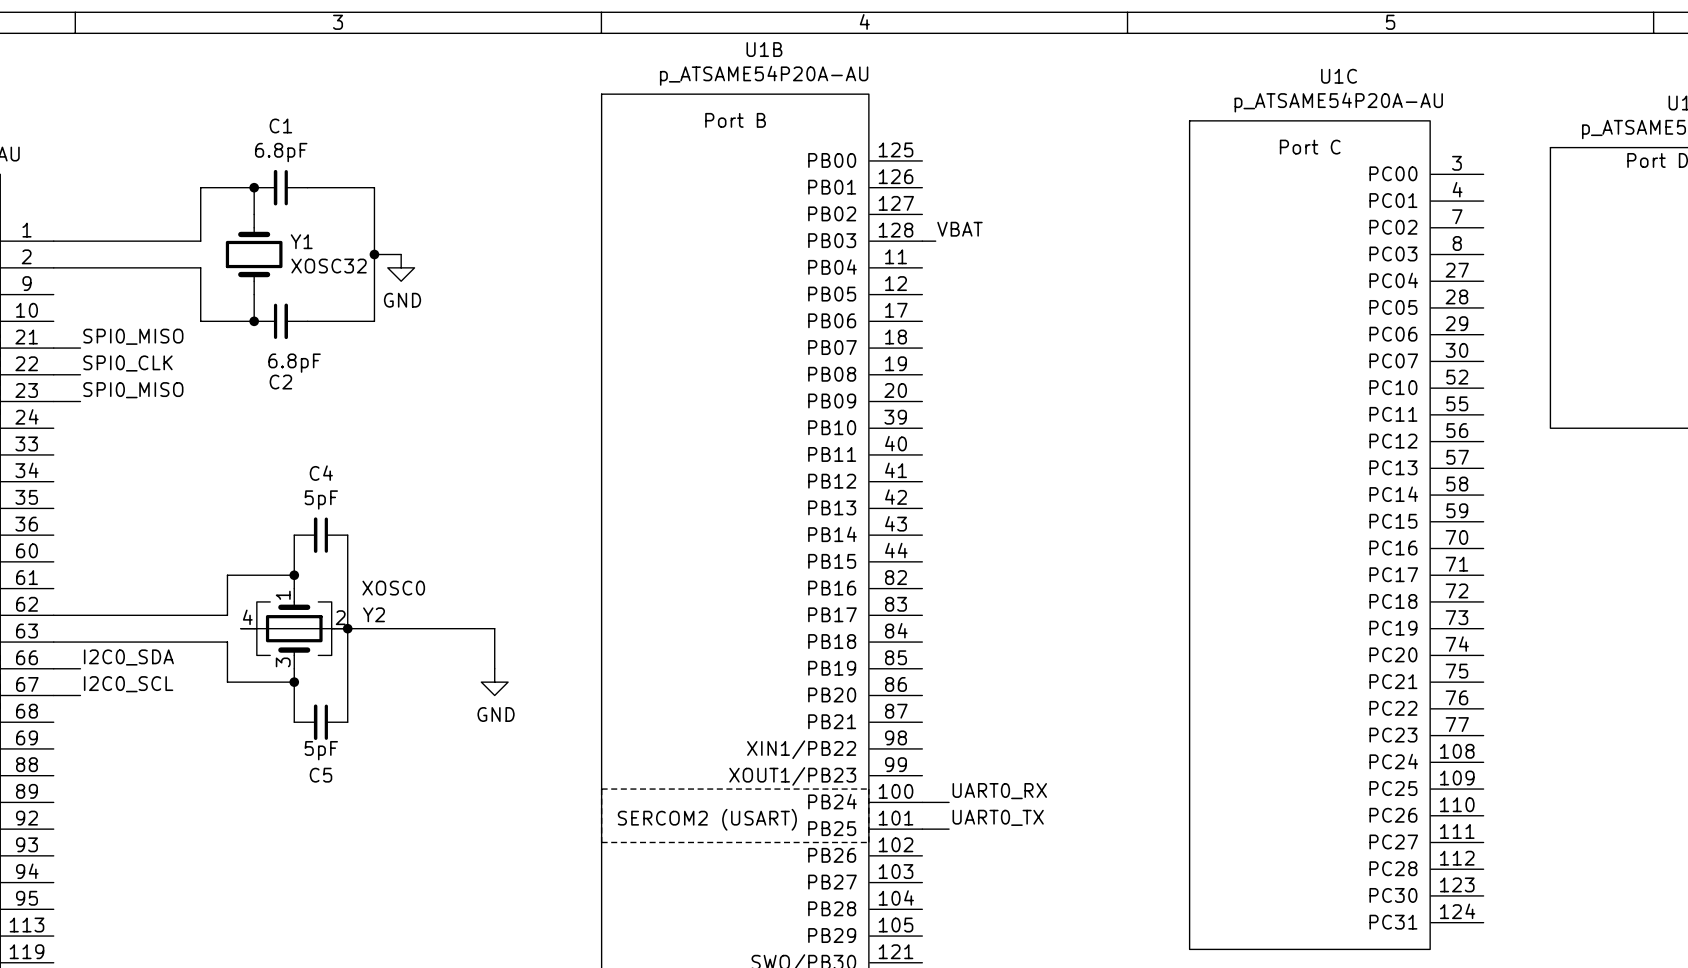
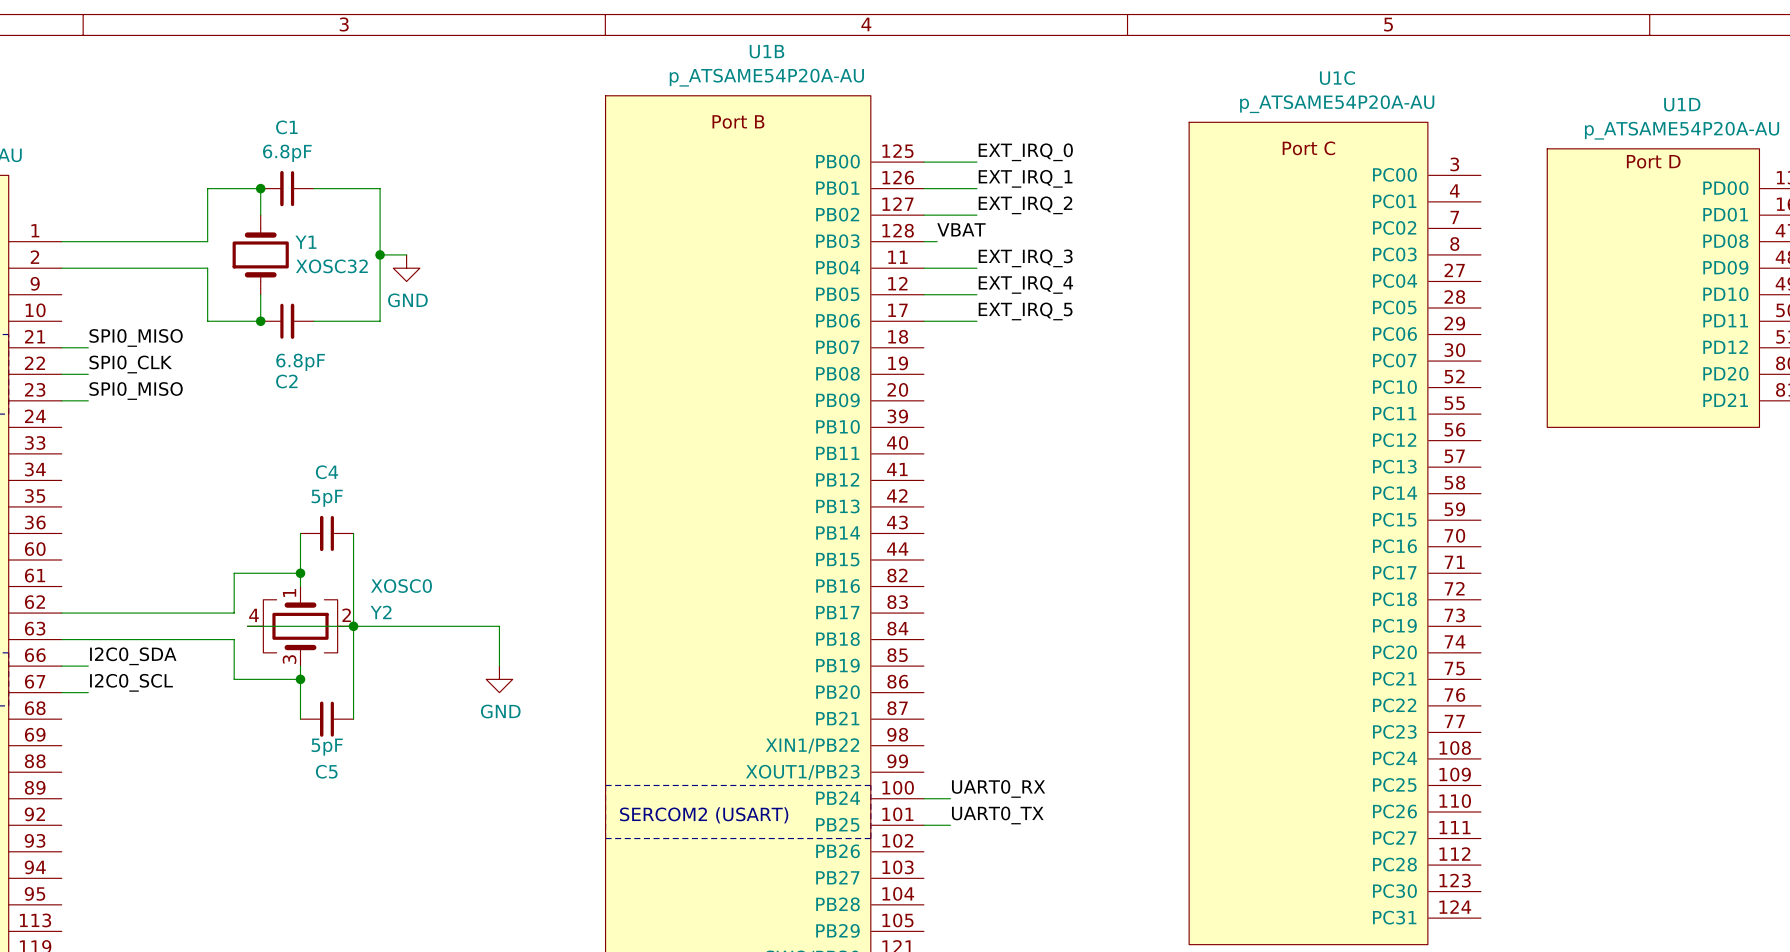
label: none -> EXT_IRQ_0 (1025, 152)
wire: none -> (923, 162) (976, 162)
label: none -> EXT_IRQ_1 (1025, 178)
wire: none -> (923, 188) (976, 188)
label: none -> EXT_IRQ_2 (1025, 205)
wire: none -> (923, 215) (976, 215)
label: none -> EXT_IRQ_3 (1025, 258)
wire: none -> (923, 268) (976, 268)
label: none -> EXT_IRQ_4 (1025, 284)
wire: none -> (923, 294) (976, 294)
label: none -> EXT_IRQ_5 (1025, 311)
wire: none -> (923, 321) (976, 321)

